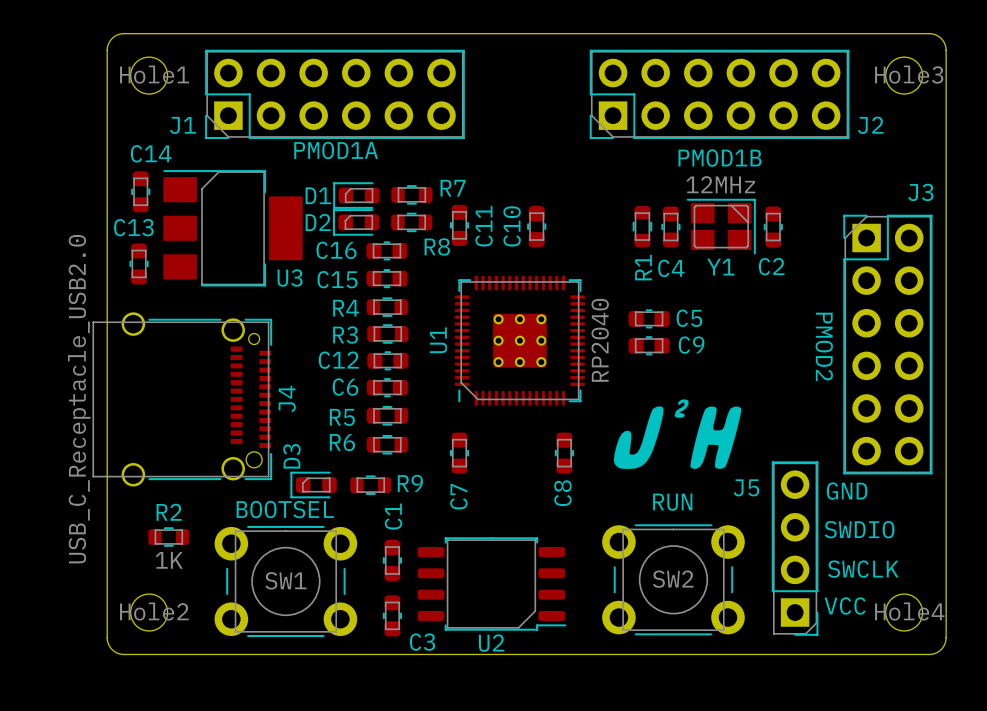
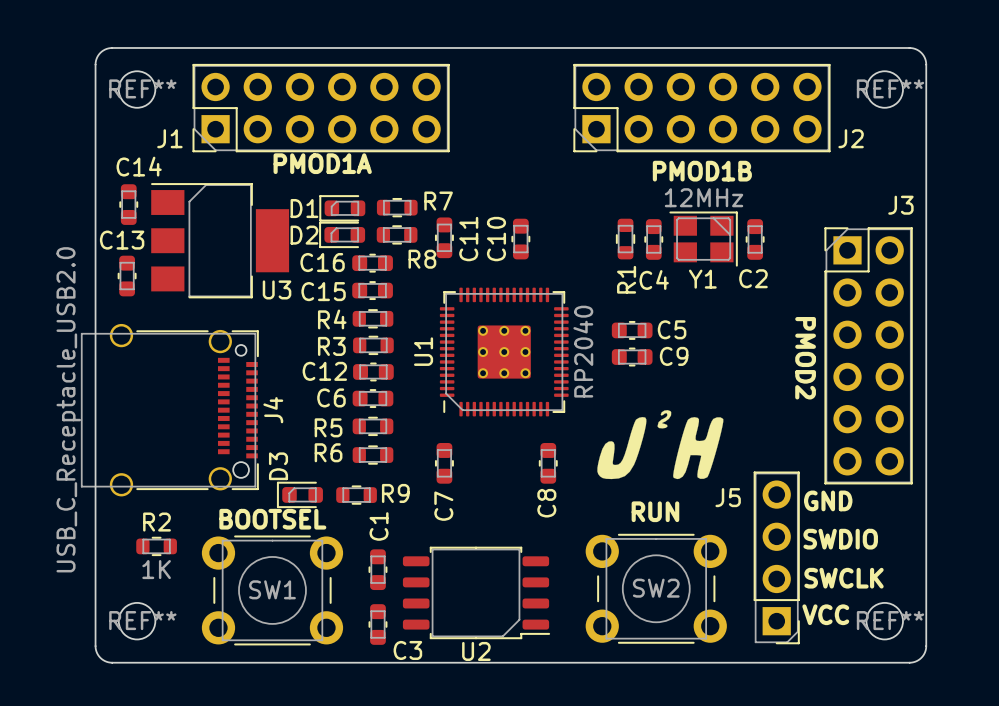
Hole1 name: Hole1 (154, 74) -> REF** (142, 88)
Hole3 name: Hole3 (909, 74) -> REF** (890, 88)
Hole2 name: Hole2 (154, 611) -> REF** (142, 620)
Hole4 name: Hole4 (909, 611) -> REF** (890, 620)

